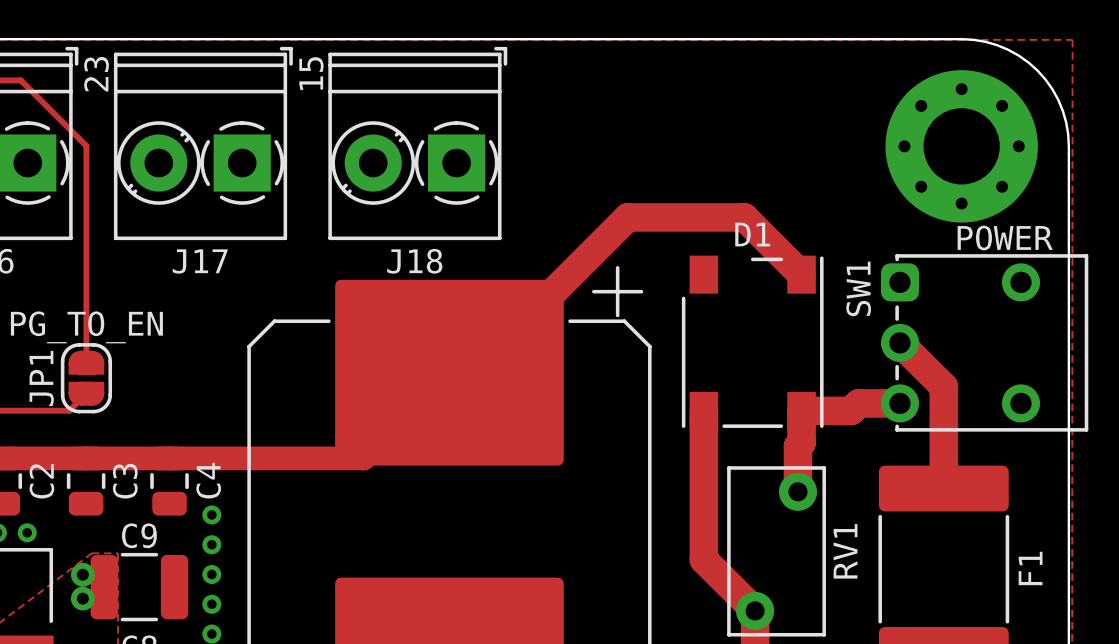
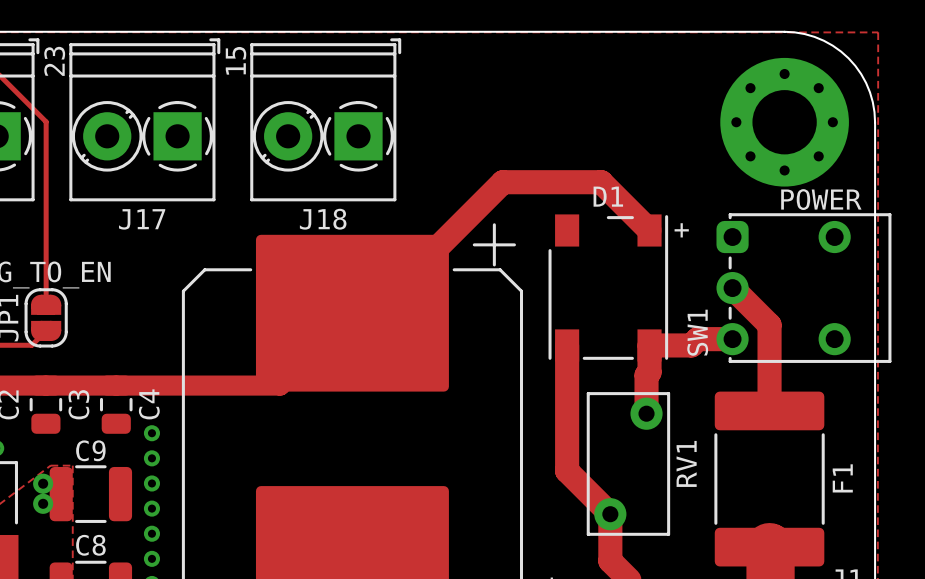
D1 text: none -> + (681, 230)
SW1 name position: SW1 (858, 288) -> SW1 (697, 332)

